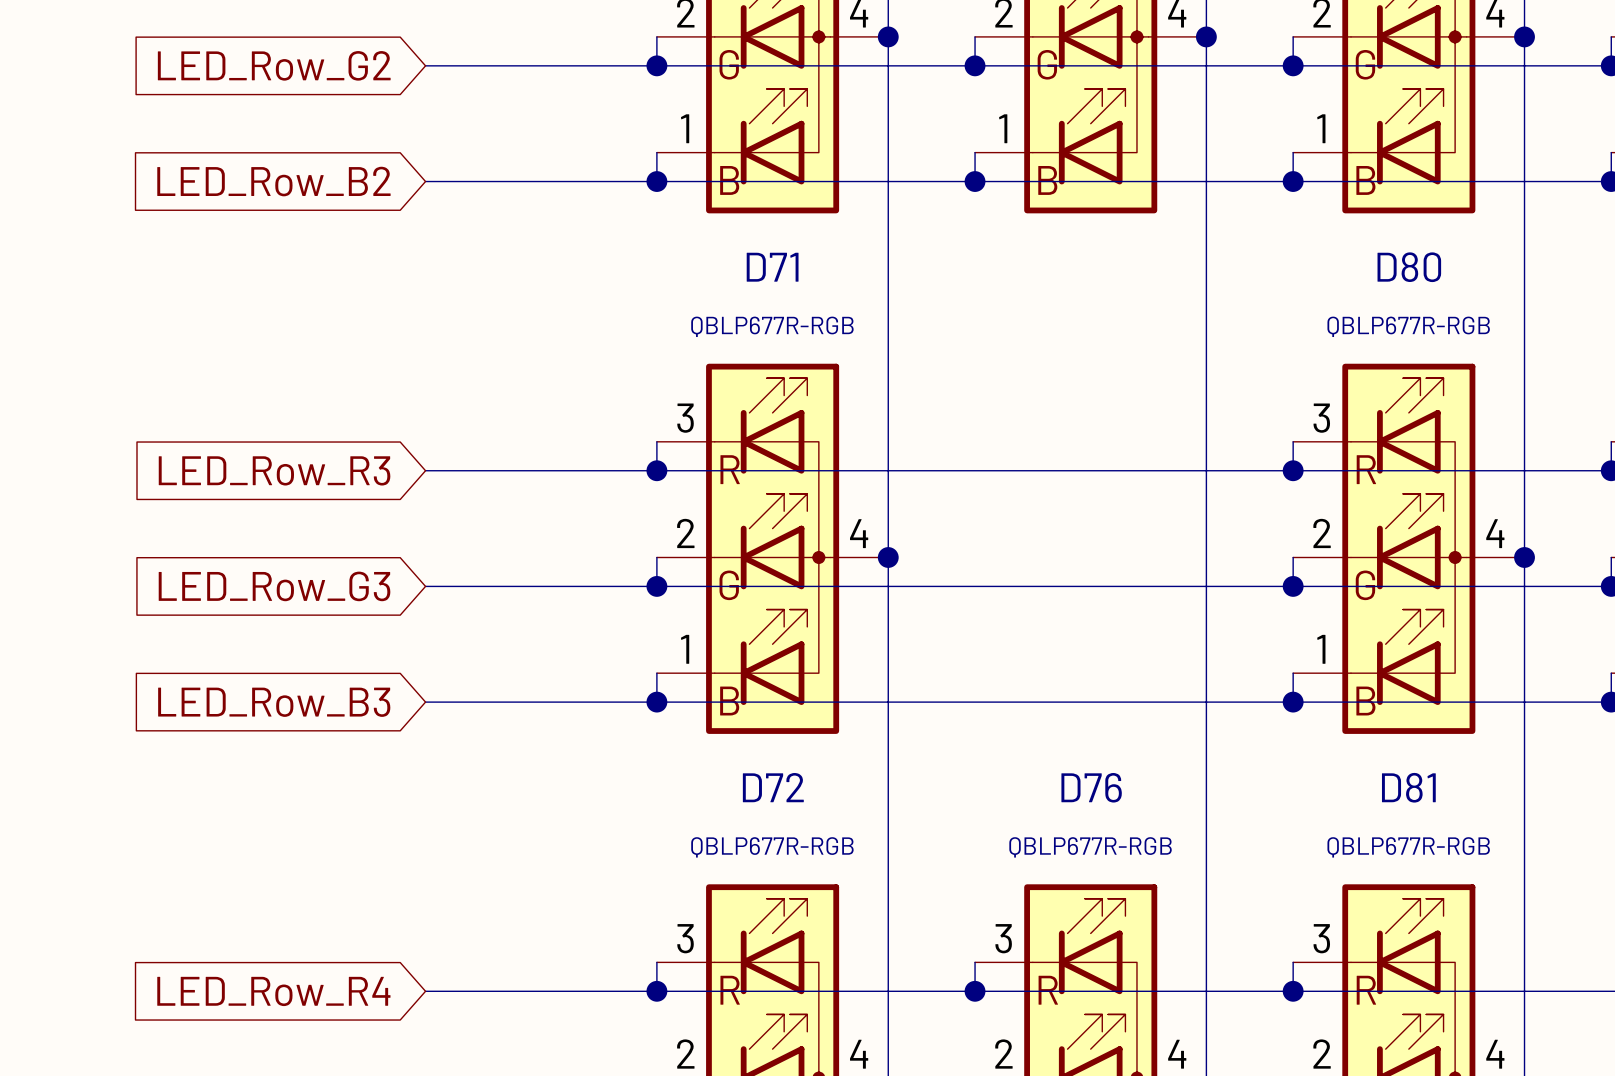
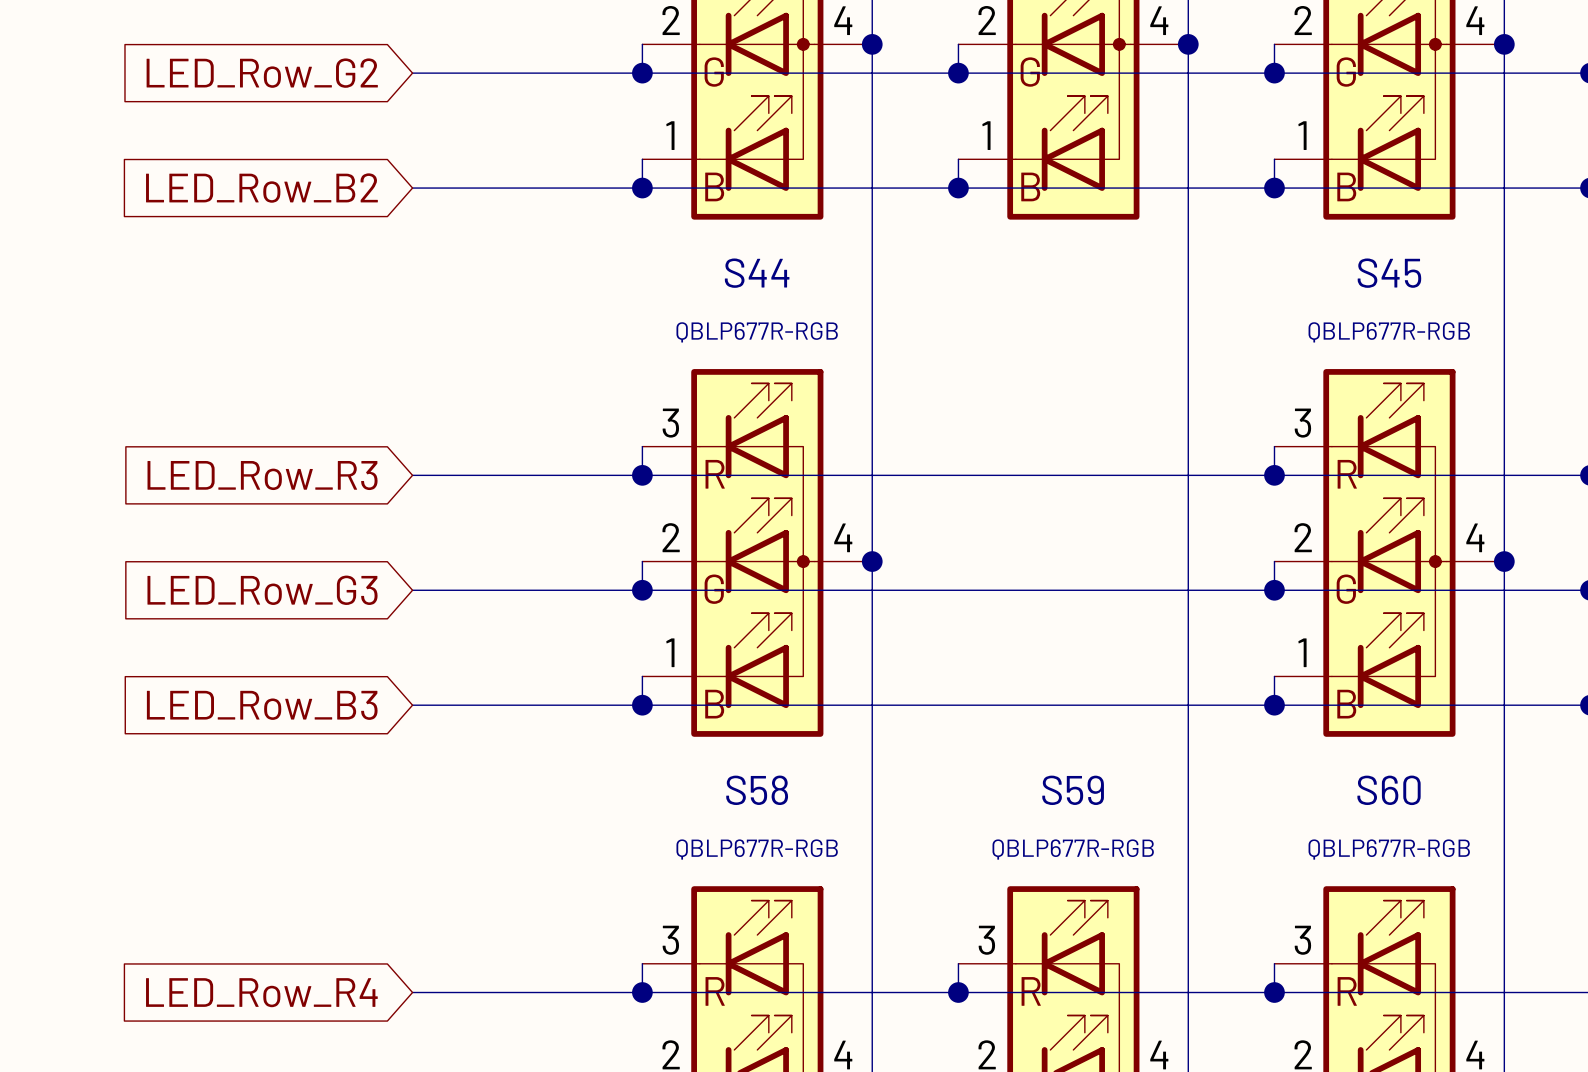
D71 name: D71 (772, 267) -> S44 (757, 273)
D80 name: D80 (1409, 267) -> S45 (1389, 273)
D72 name: D72 (773, 787) -> S58 (757, 790)
D76 name: D76 (1091, 787) -> S59 (1073, 790)
D81 name: D81 (1408, 787) -> S60 (1389, 790)

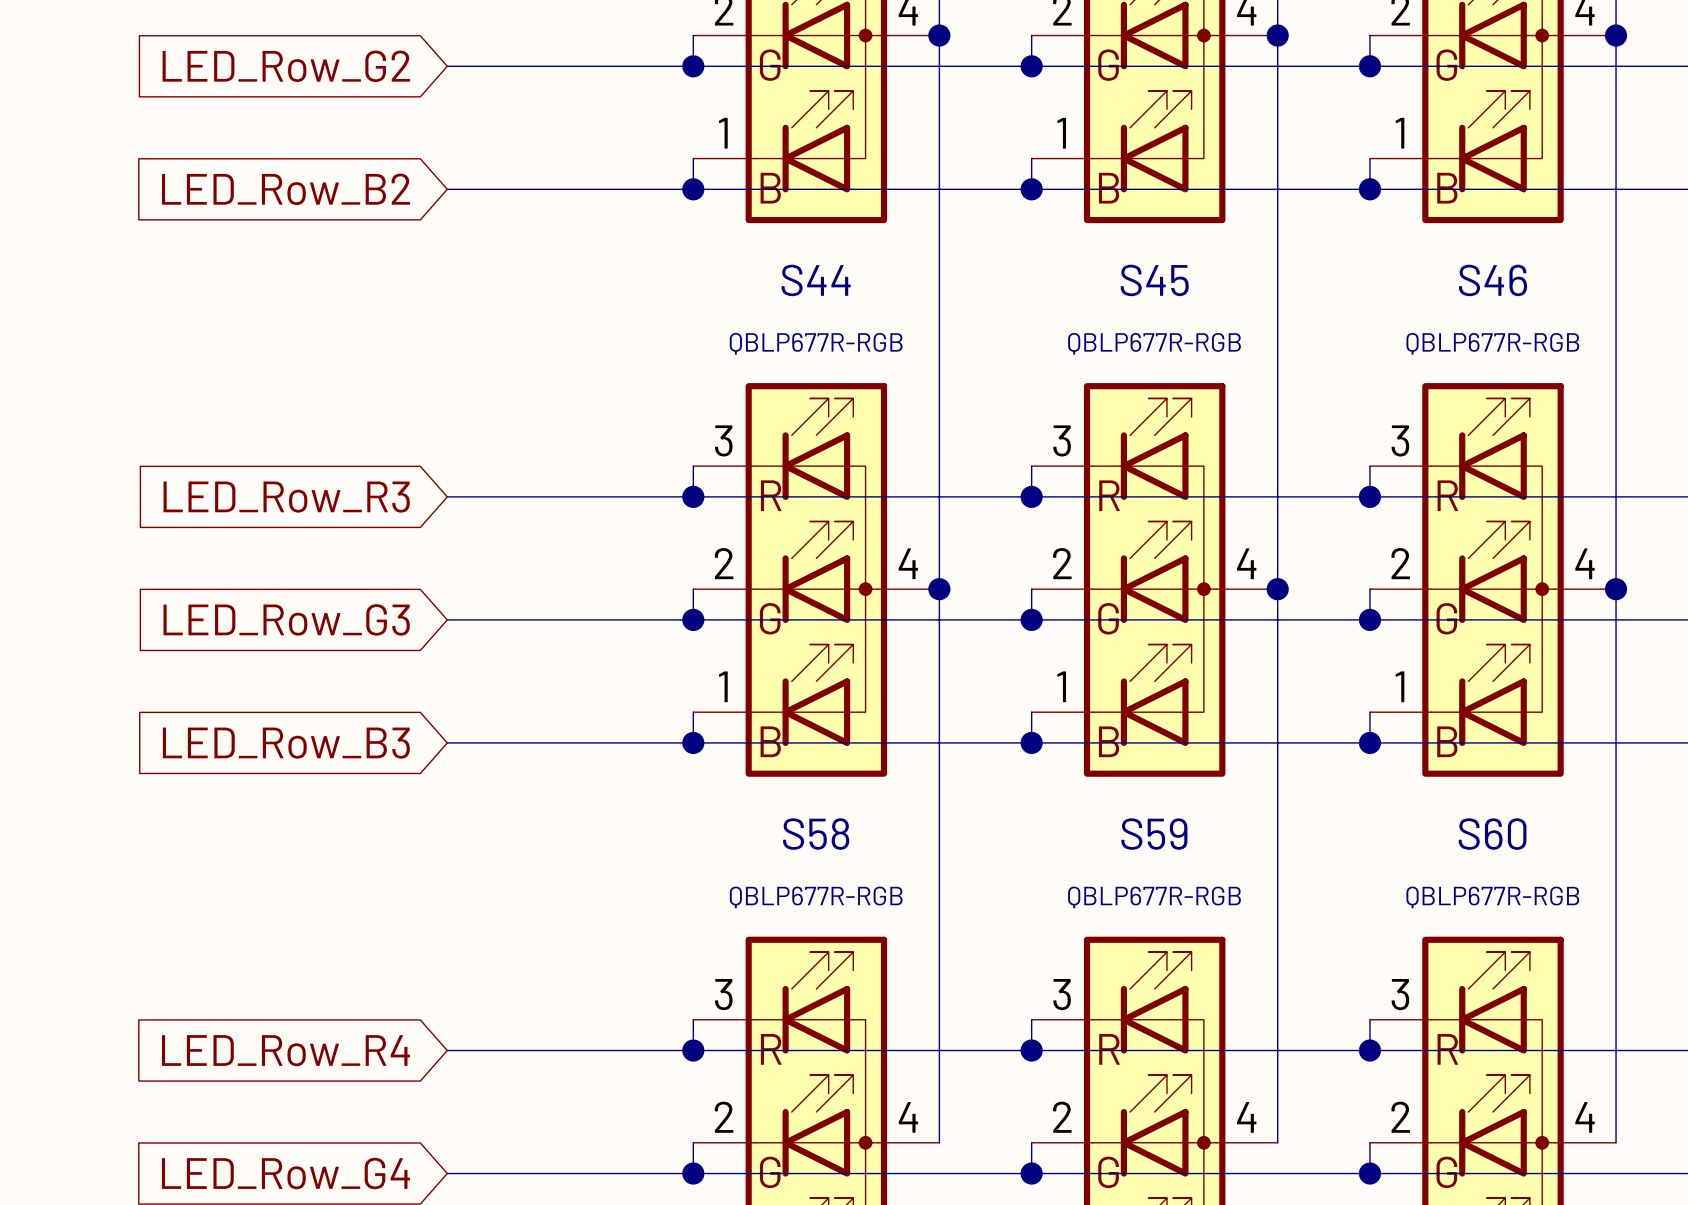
S45 name: S45 (1389, 273) -> S46 (1493, 280)
wire: none -> (1031, 466) (1031, 496)
junction: none -> (1031, 496)
S45: none -> QBLP677R-RGB (1154, 579)
wire: none -> (1031, 589) (1031, 619)
junction: none -> (1277, 589)
junction: none -> (1031, 619)
wire: none -> (1031, 712) (1031, 742)
junction: none -> (1031, 742)

